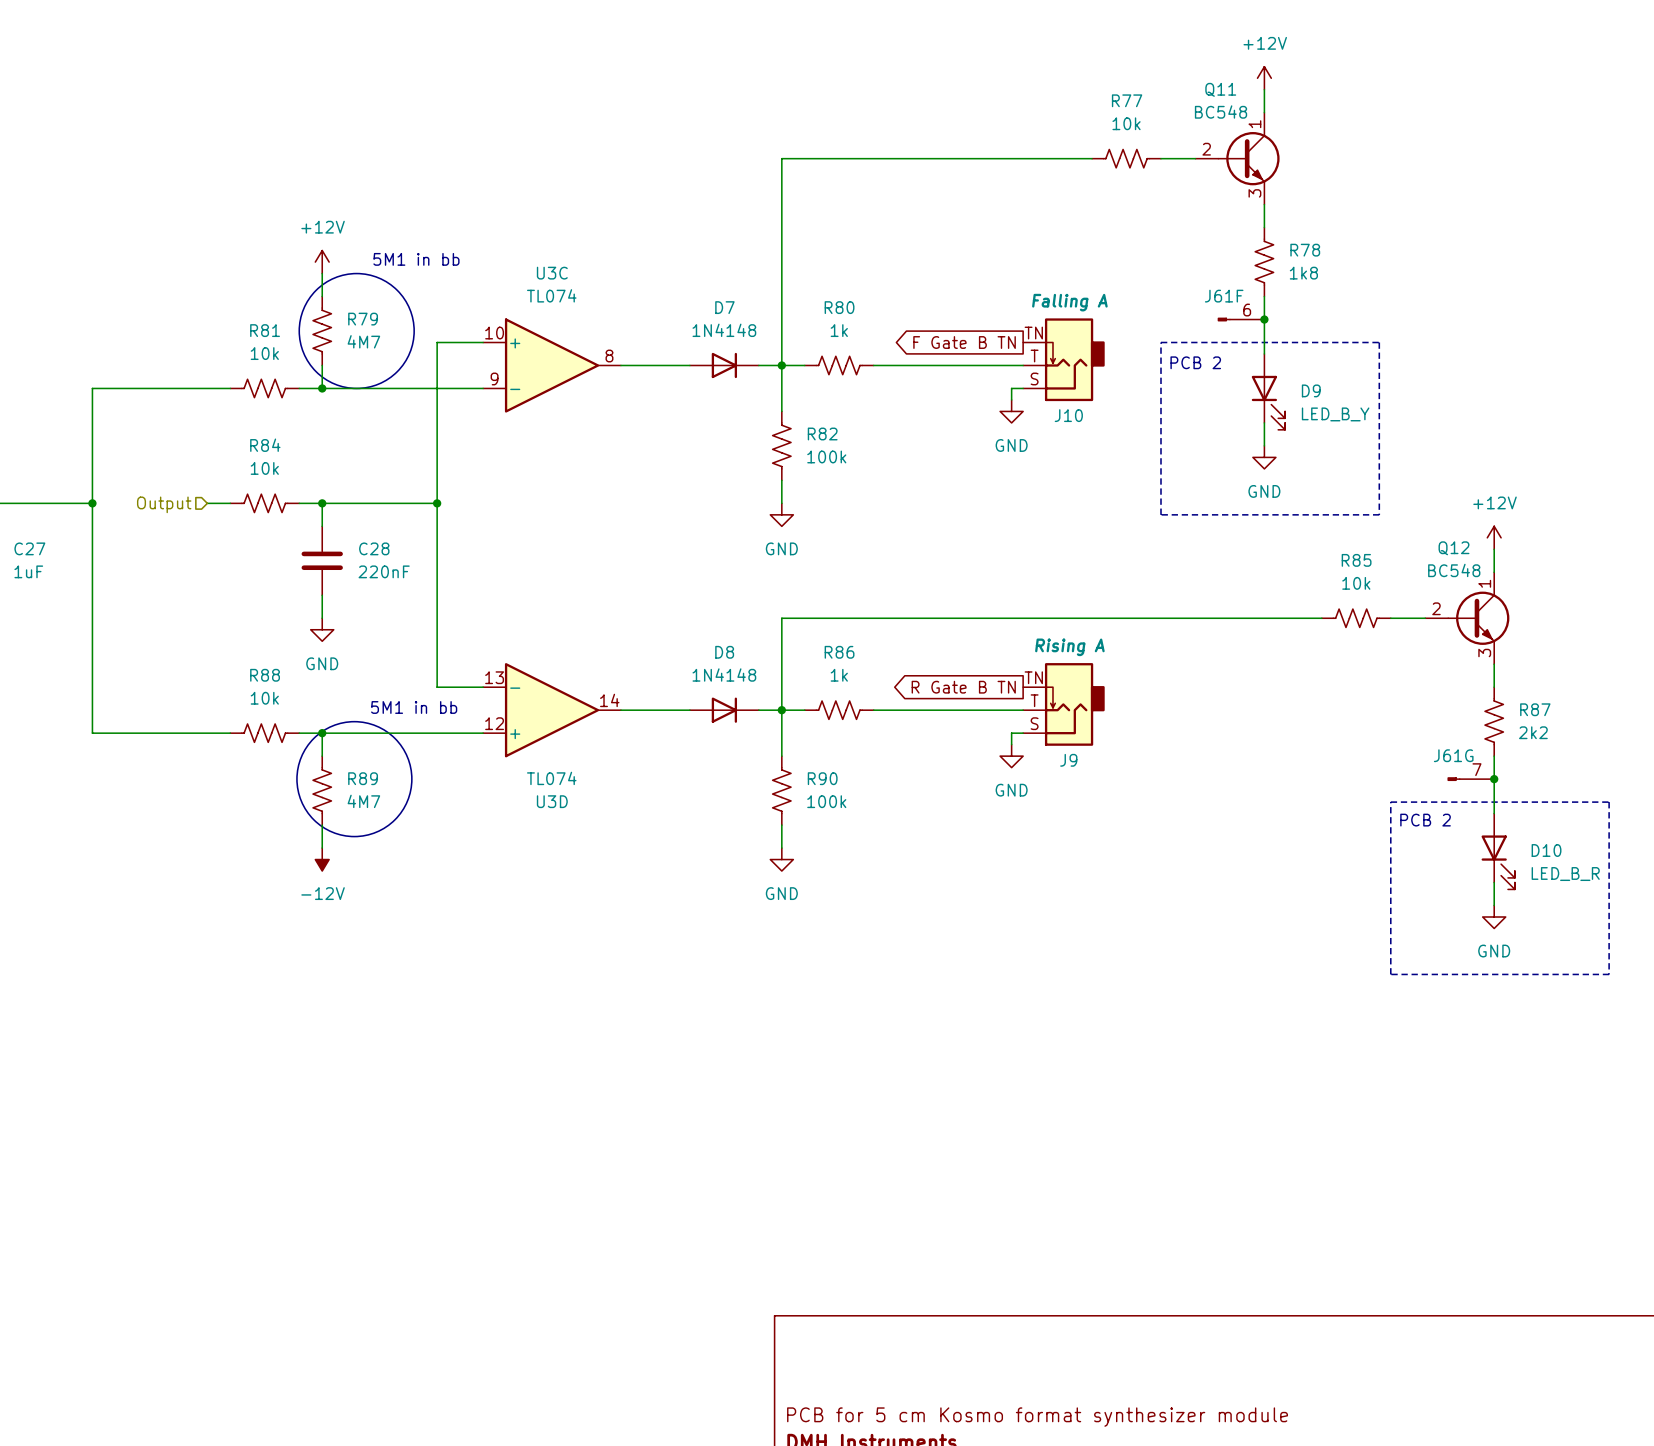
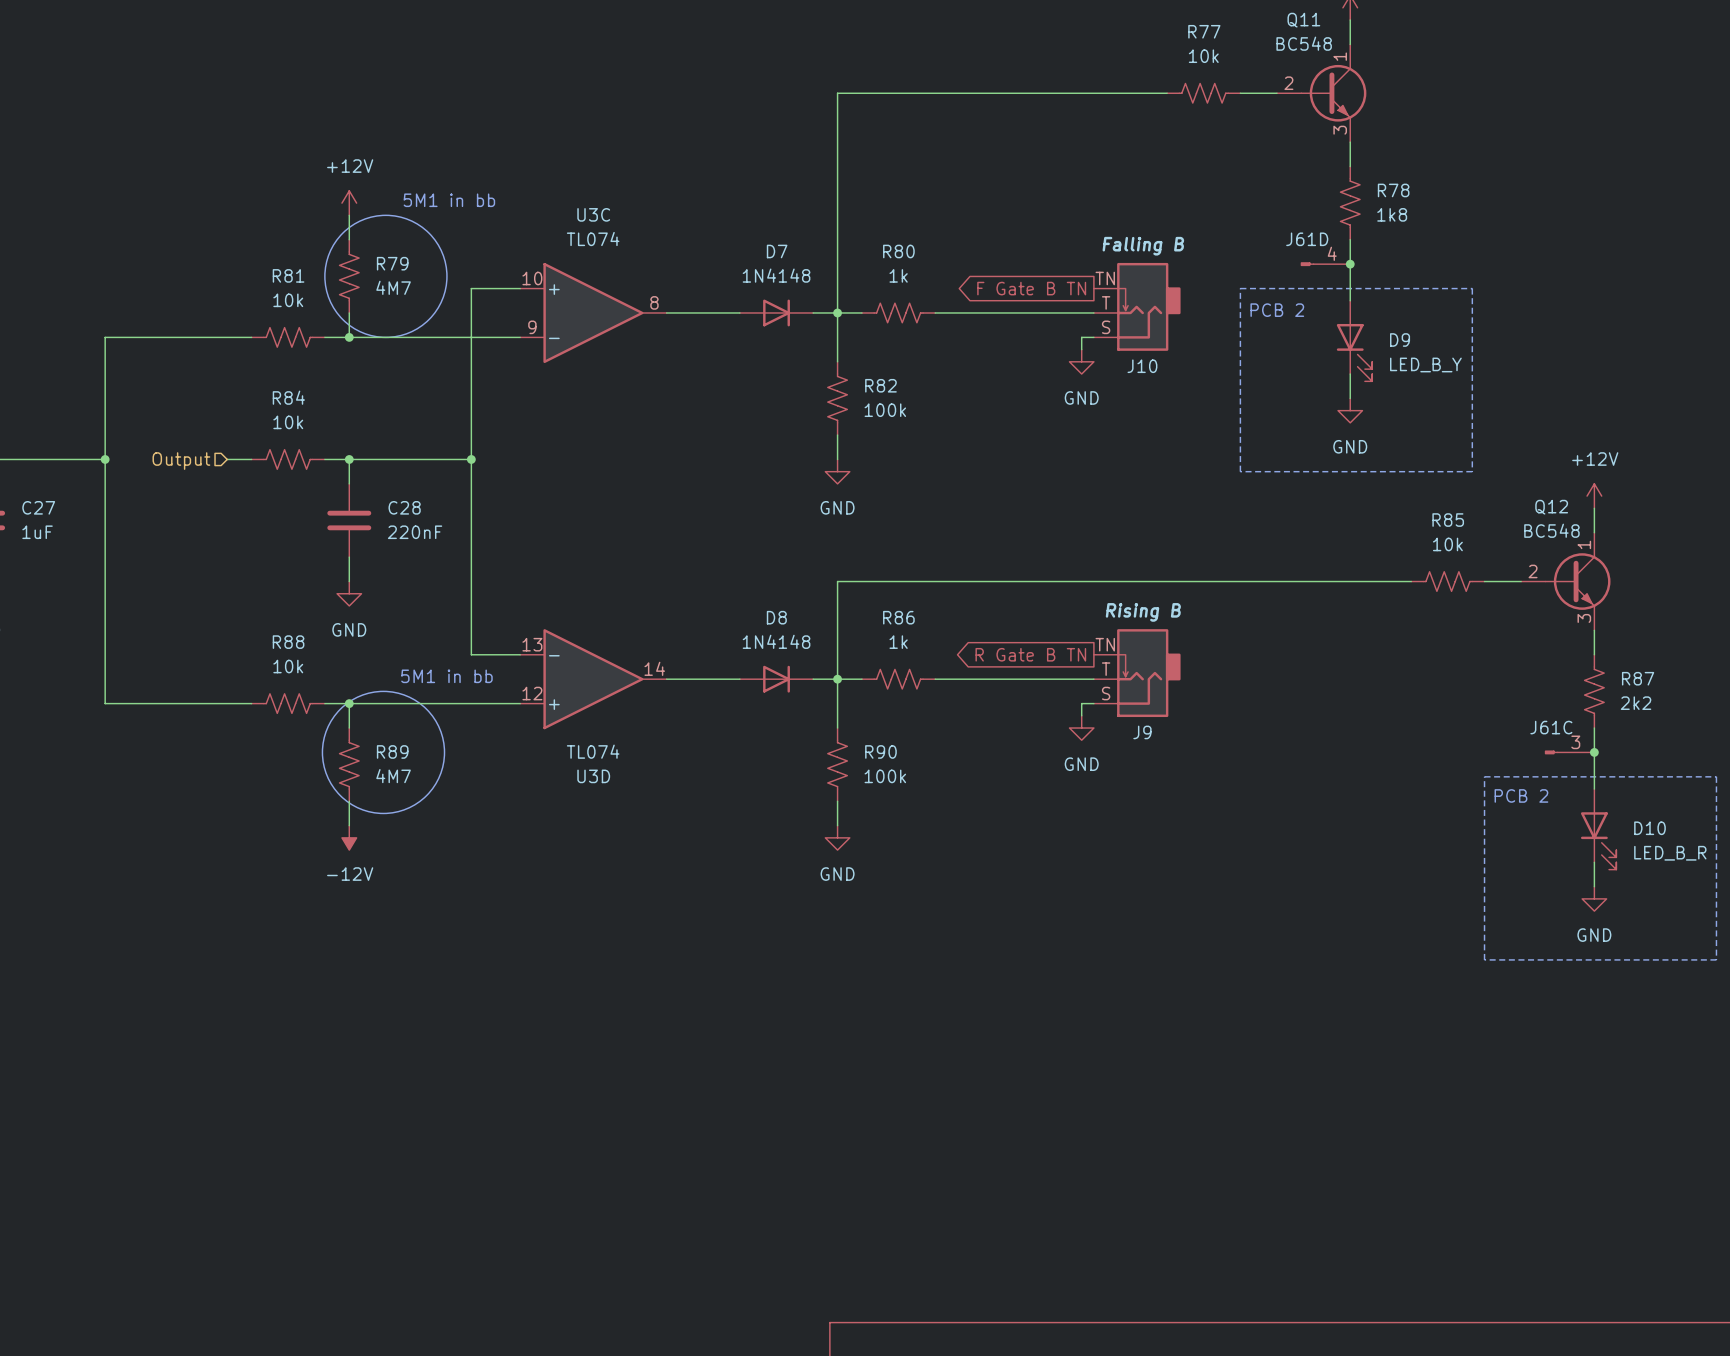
J61F name: J61F (1224, 296) -> J61D (1307, 239)
J10 text: Falling A (1069, 302) -> Falling B (1143, 246)
J61F pin number: 6 (1247, 310) -> 4 (1332, 253)
J9 text: Rising A (1069, 647) -> Rising B (1143, 612)
J61G name: J61G (1453, 755) -> J61C (1551, 727)
J61G pin number: 7 (1476, 769) -> 3 (1575, 742)

